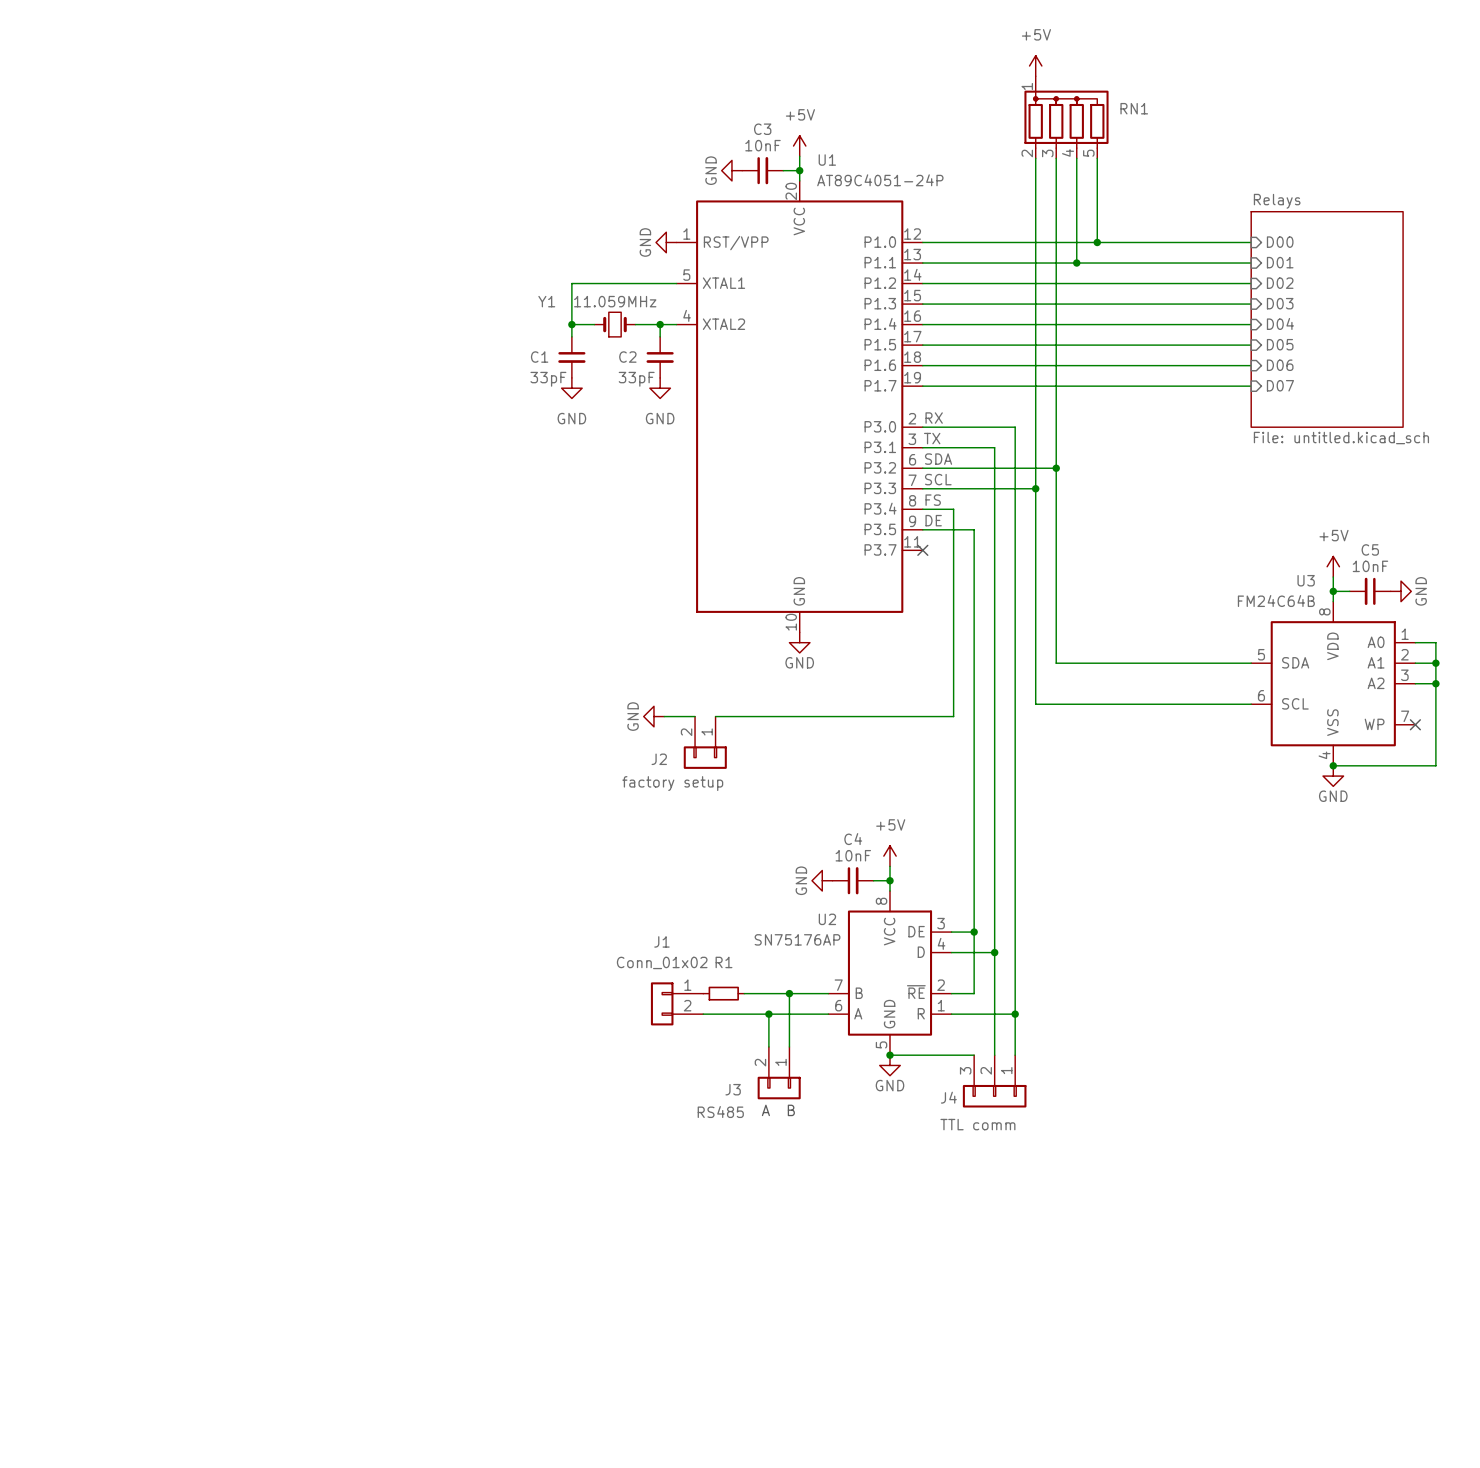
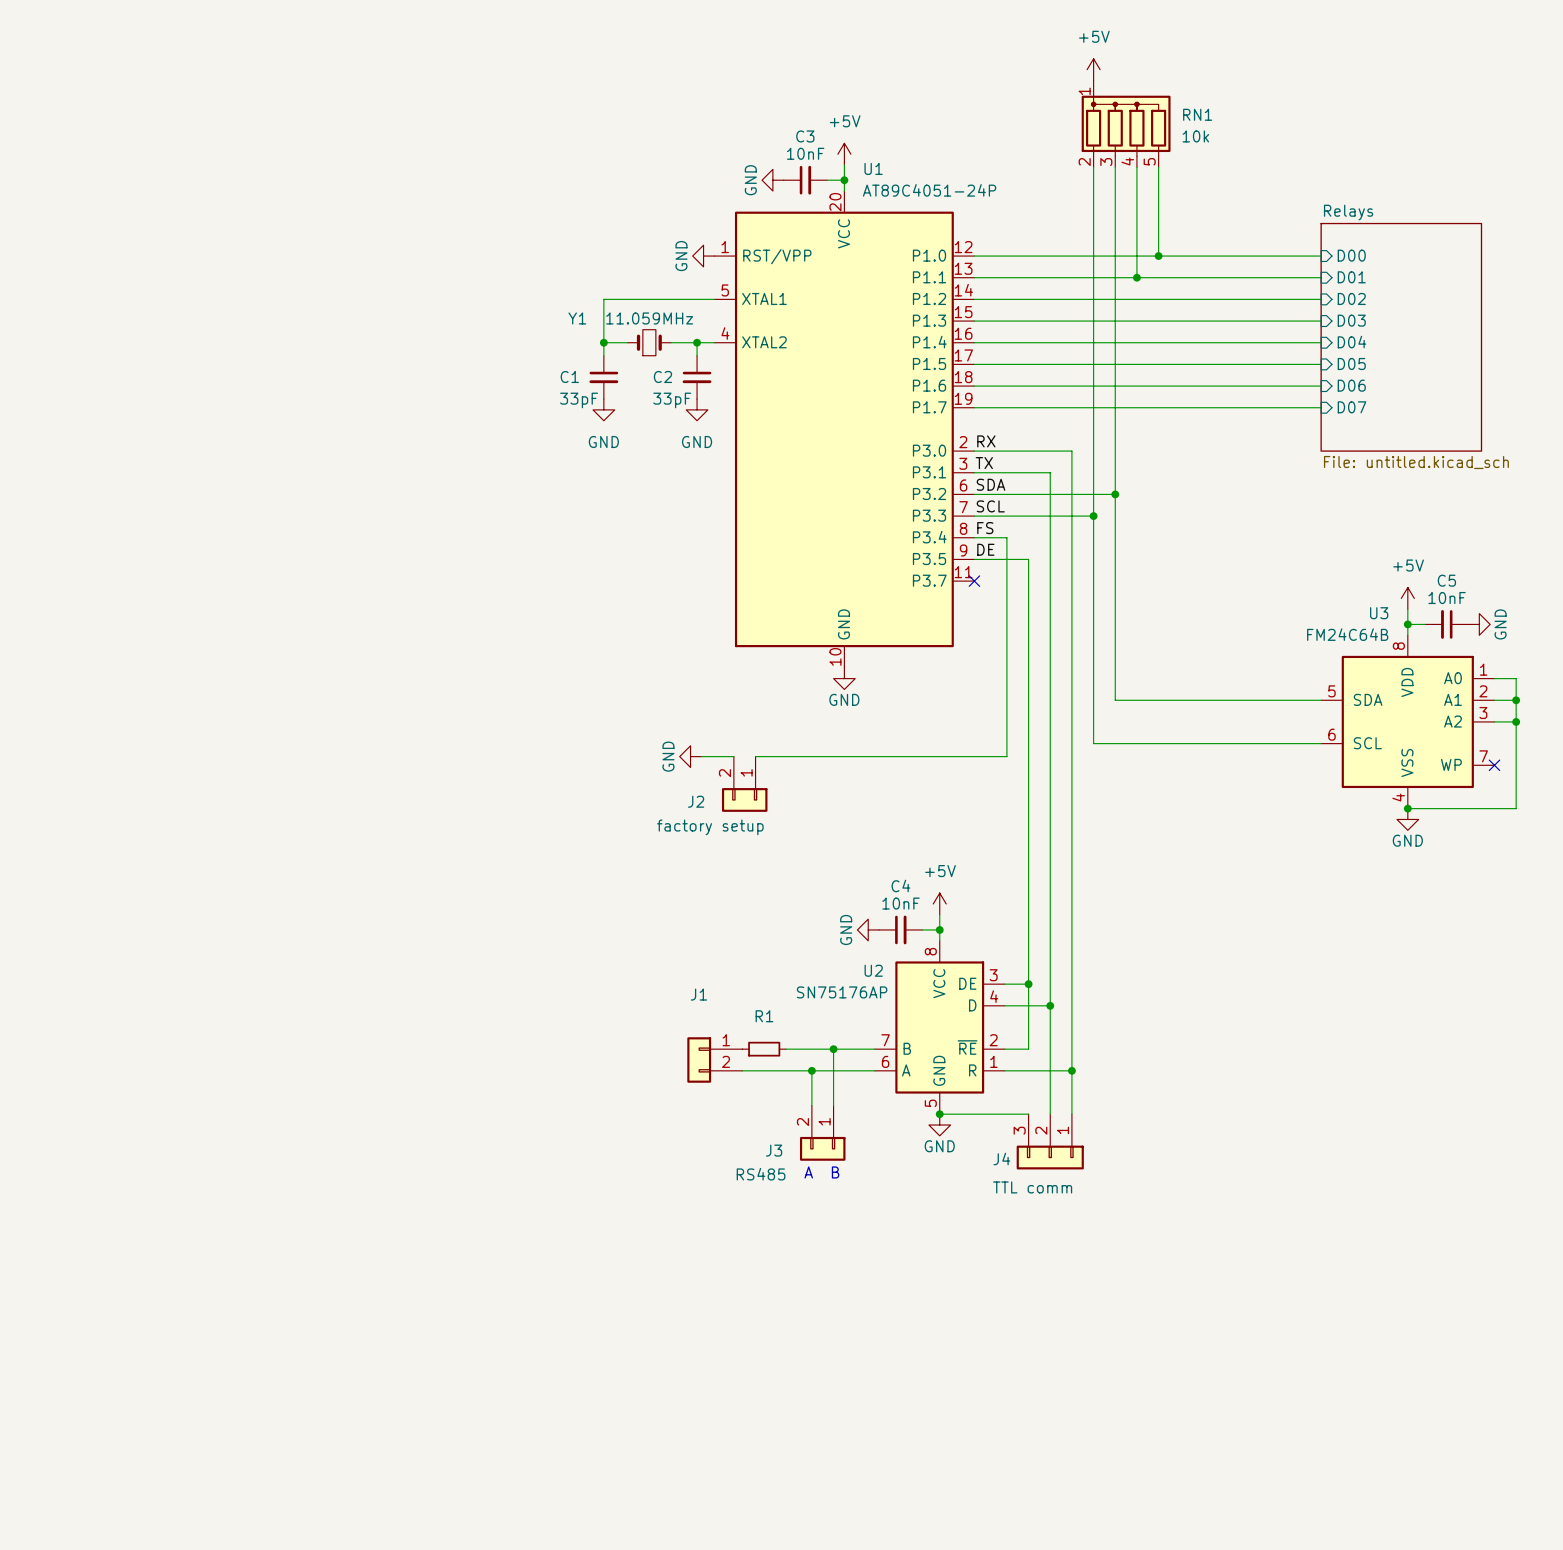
RN1 value: none -> 10k (1195, 136)
J1 value: Conn_01x02 (662, 962) -> none

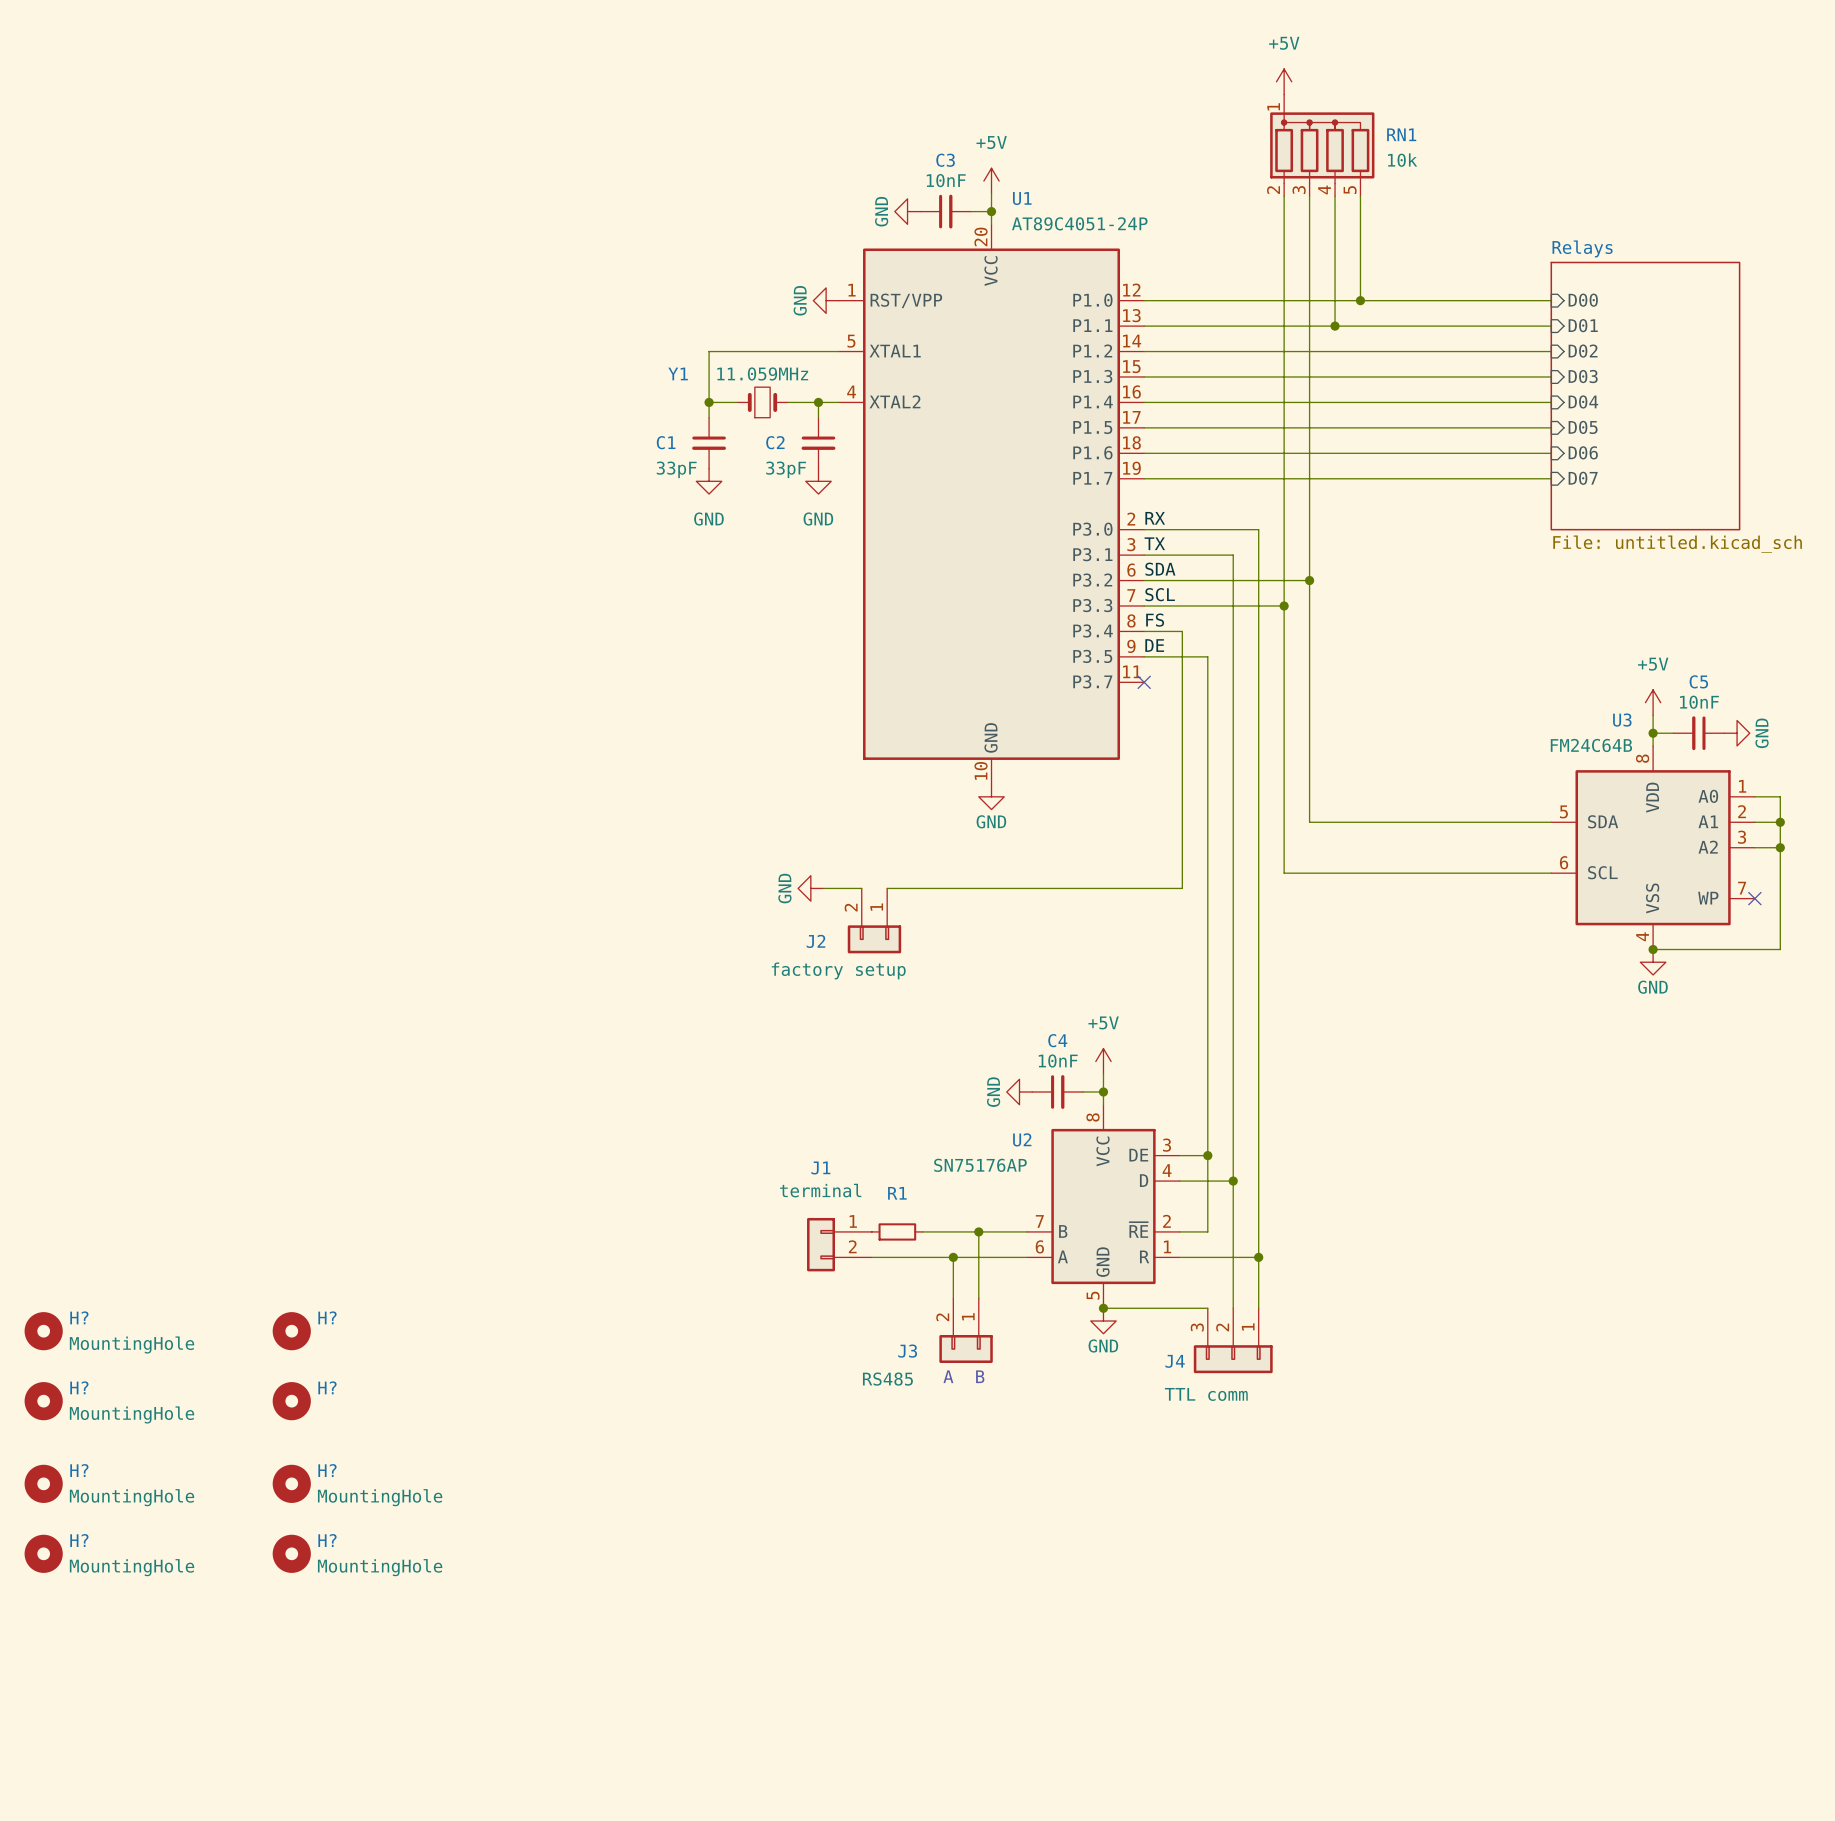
J1 value: none -> terminal (820, 1190)
H?: none -> MountingHole (43, 1331)
H?: none -> (291, 1331)
H?: none -> MountingHole (43, 1401)
H?: none -> (291, 1401)
H?: none -> MountingHole (43, 1483)
H?: none -> MountingHole (291, 1483)
H?: none -> MountingHole (43, 1553)
H?: none -> MountingHole (291, 1553)

